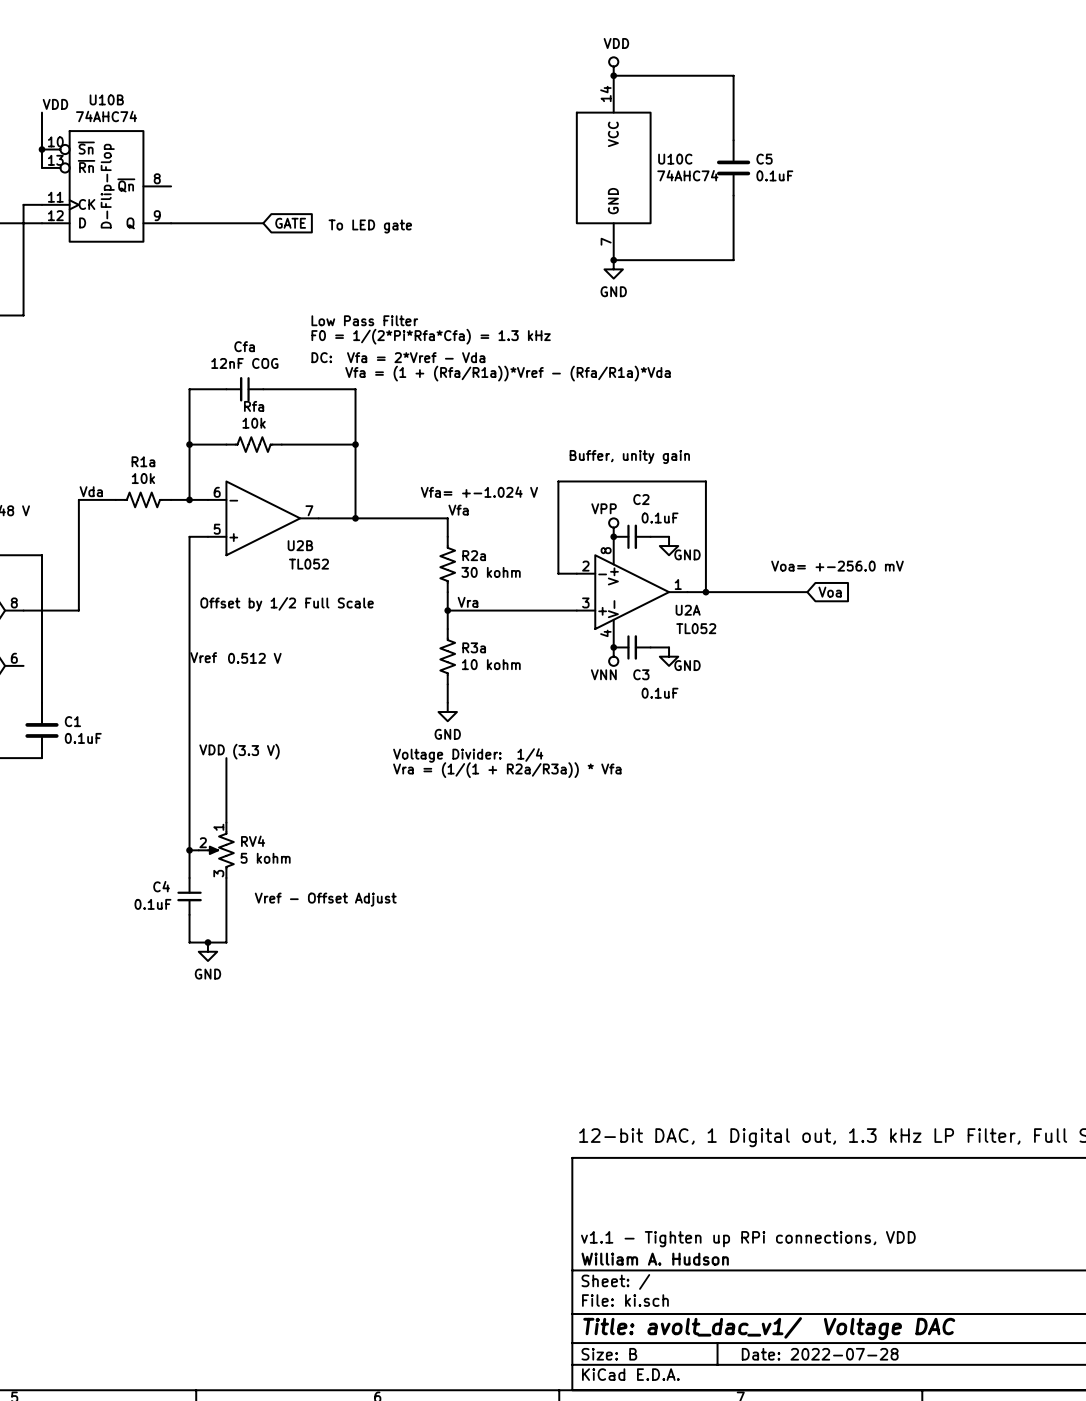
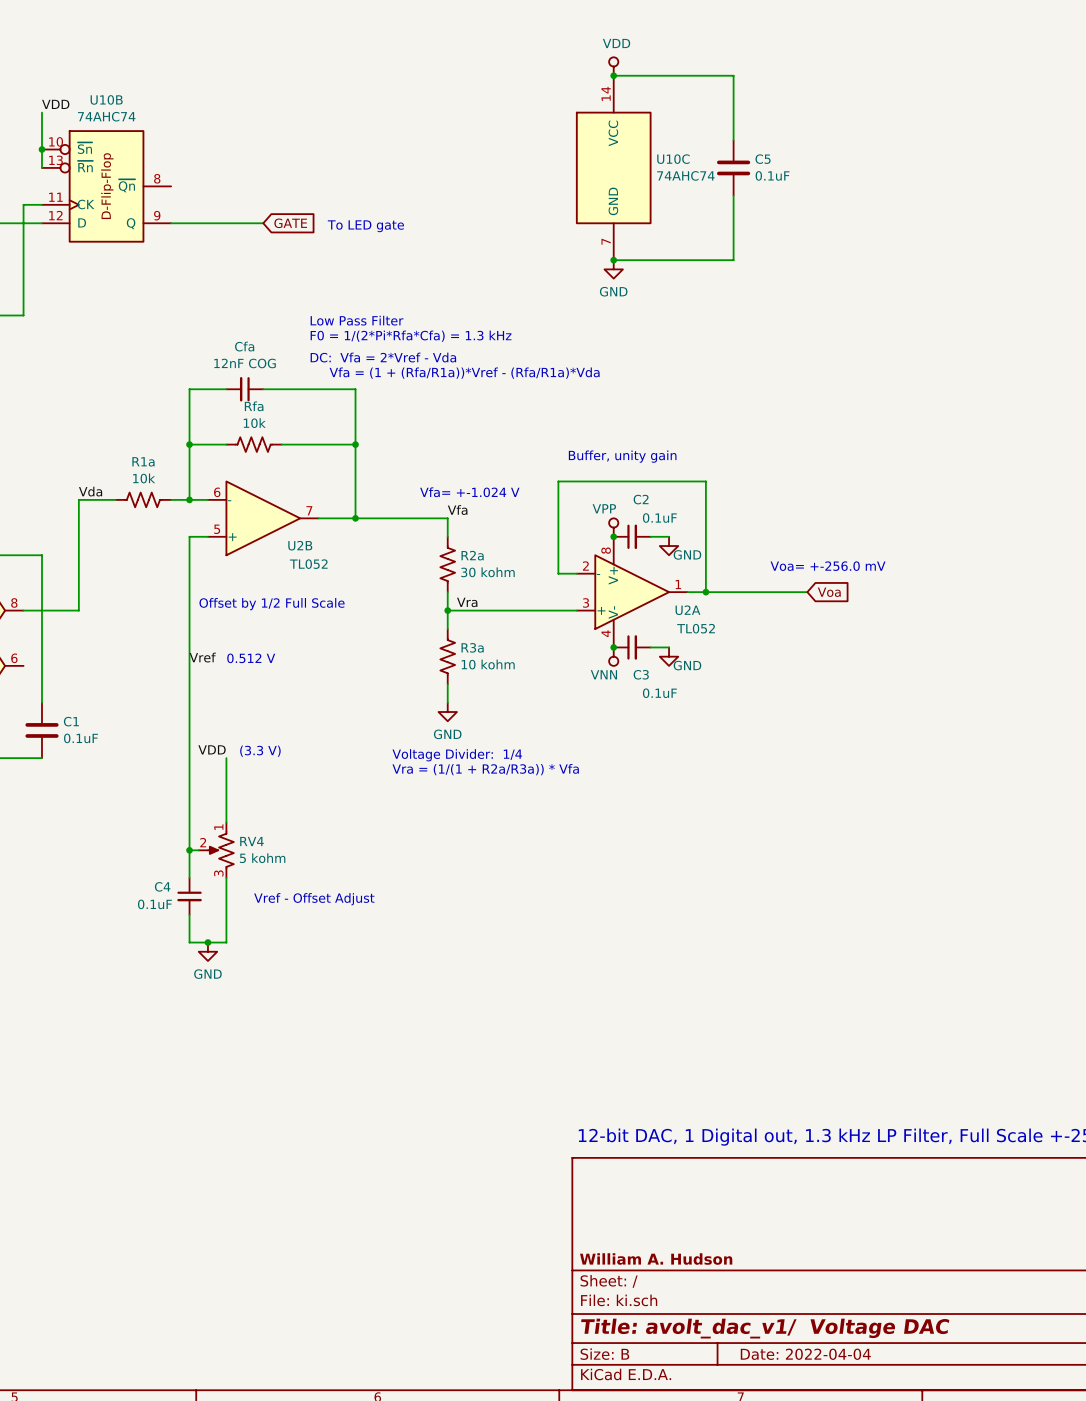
title block: v1.1 - Tighten up RPi connections, VDD (748, 1239) -> none
title block: Date: 2022-07-28 (820, 1354) -> Date: 2022-04-04 (805, 1354)

